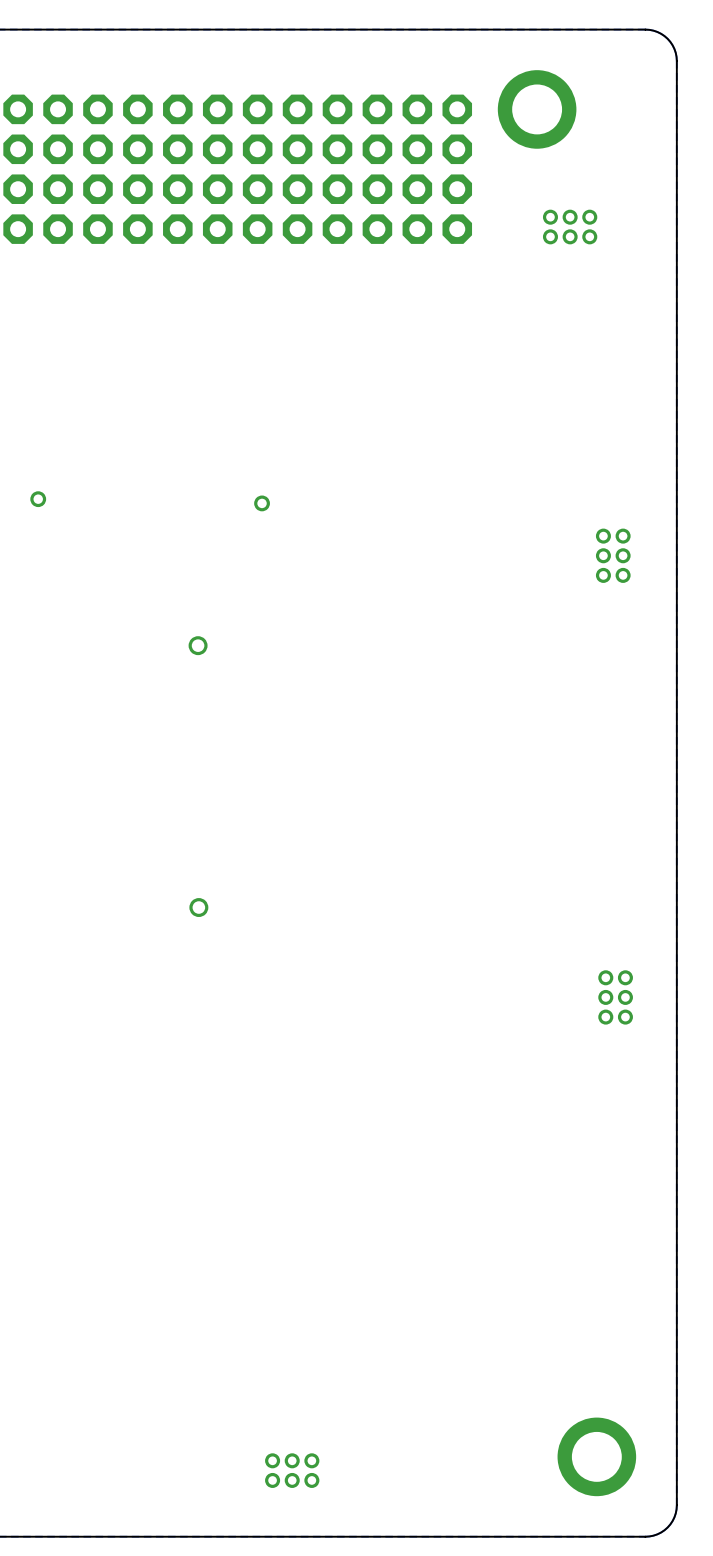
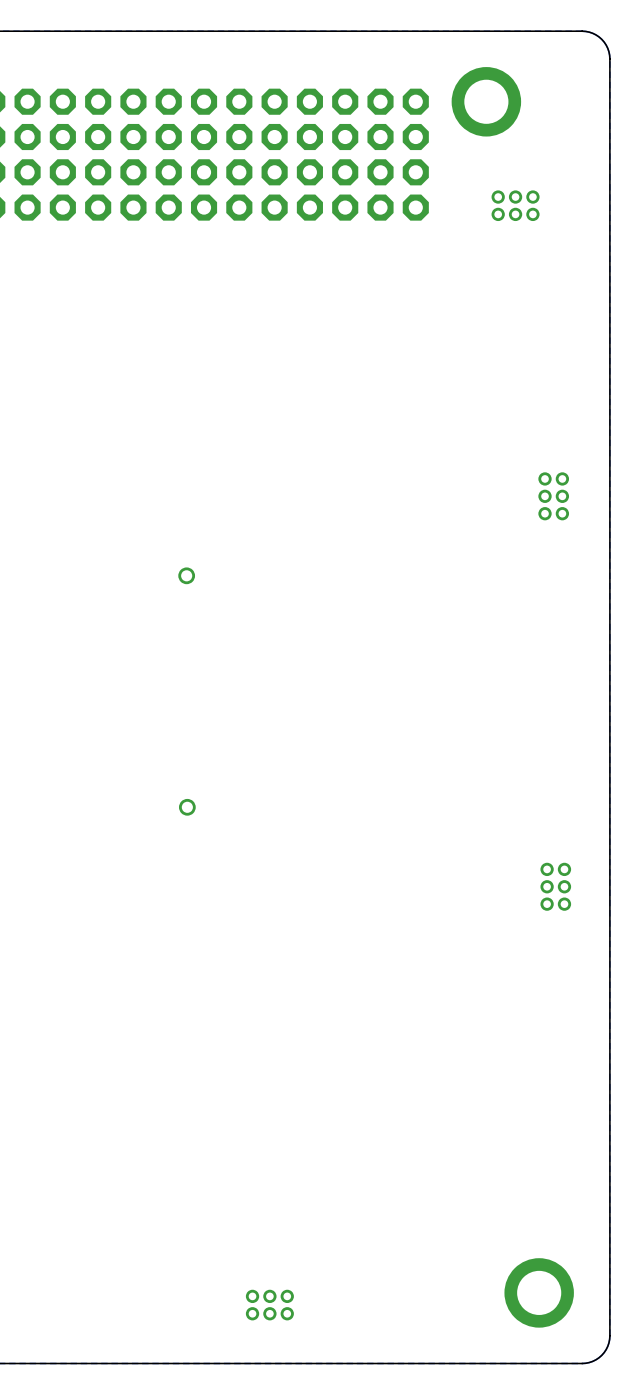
via: (38, 499) -> none
via: (262, 503) -> none

